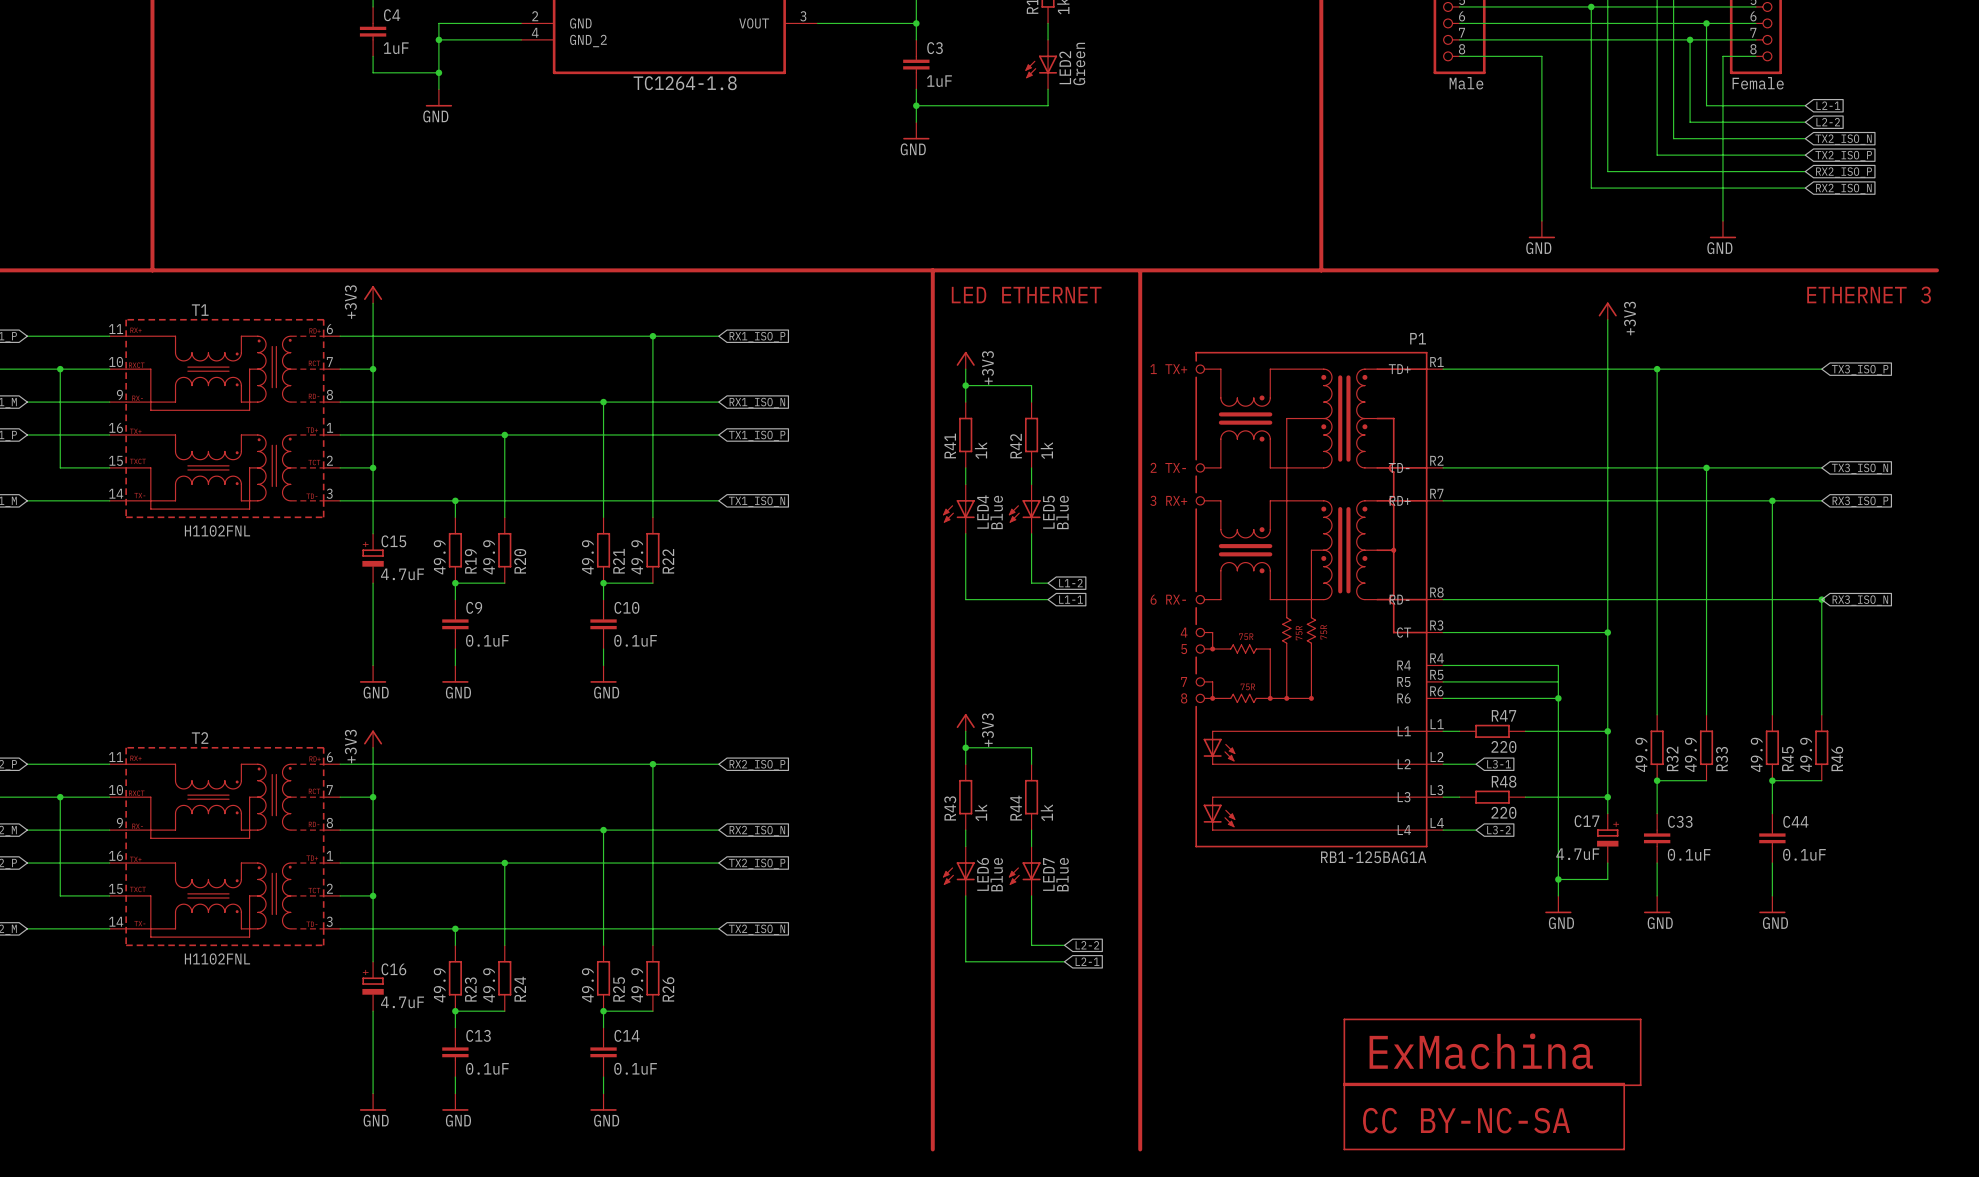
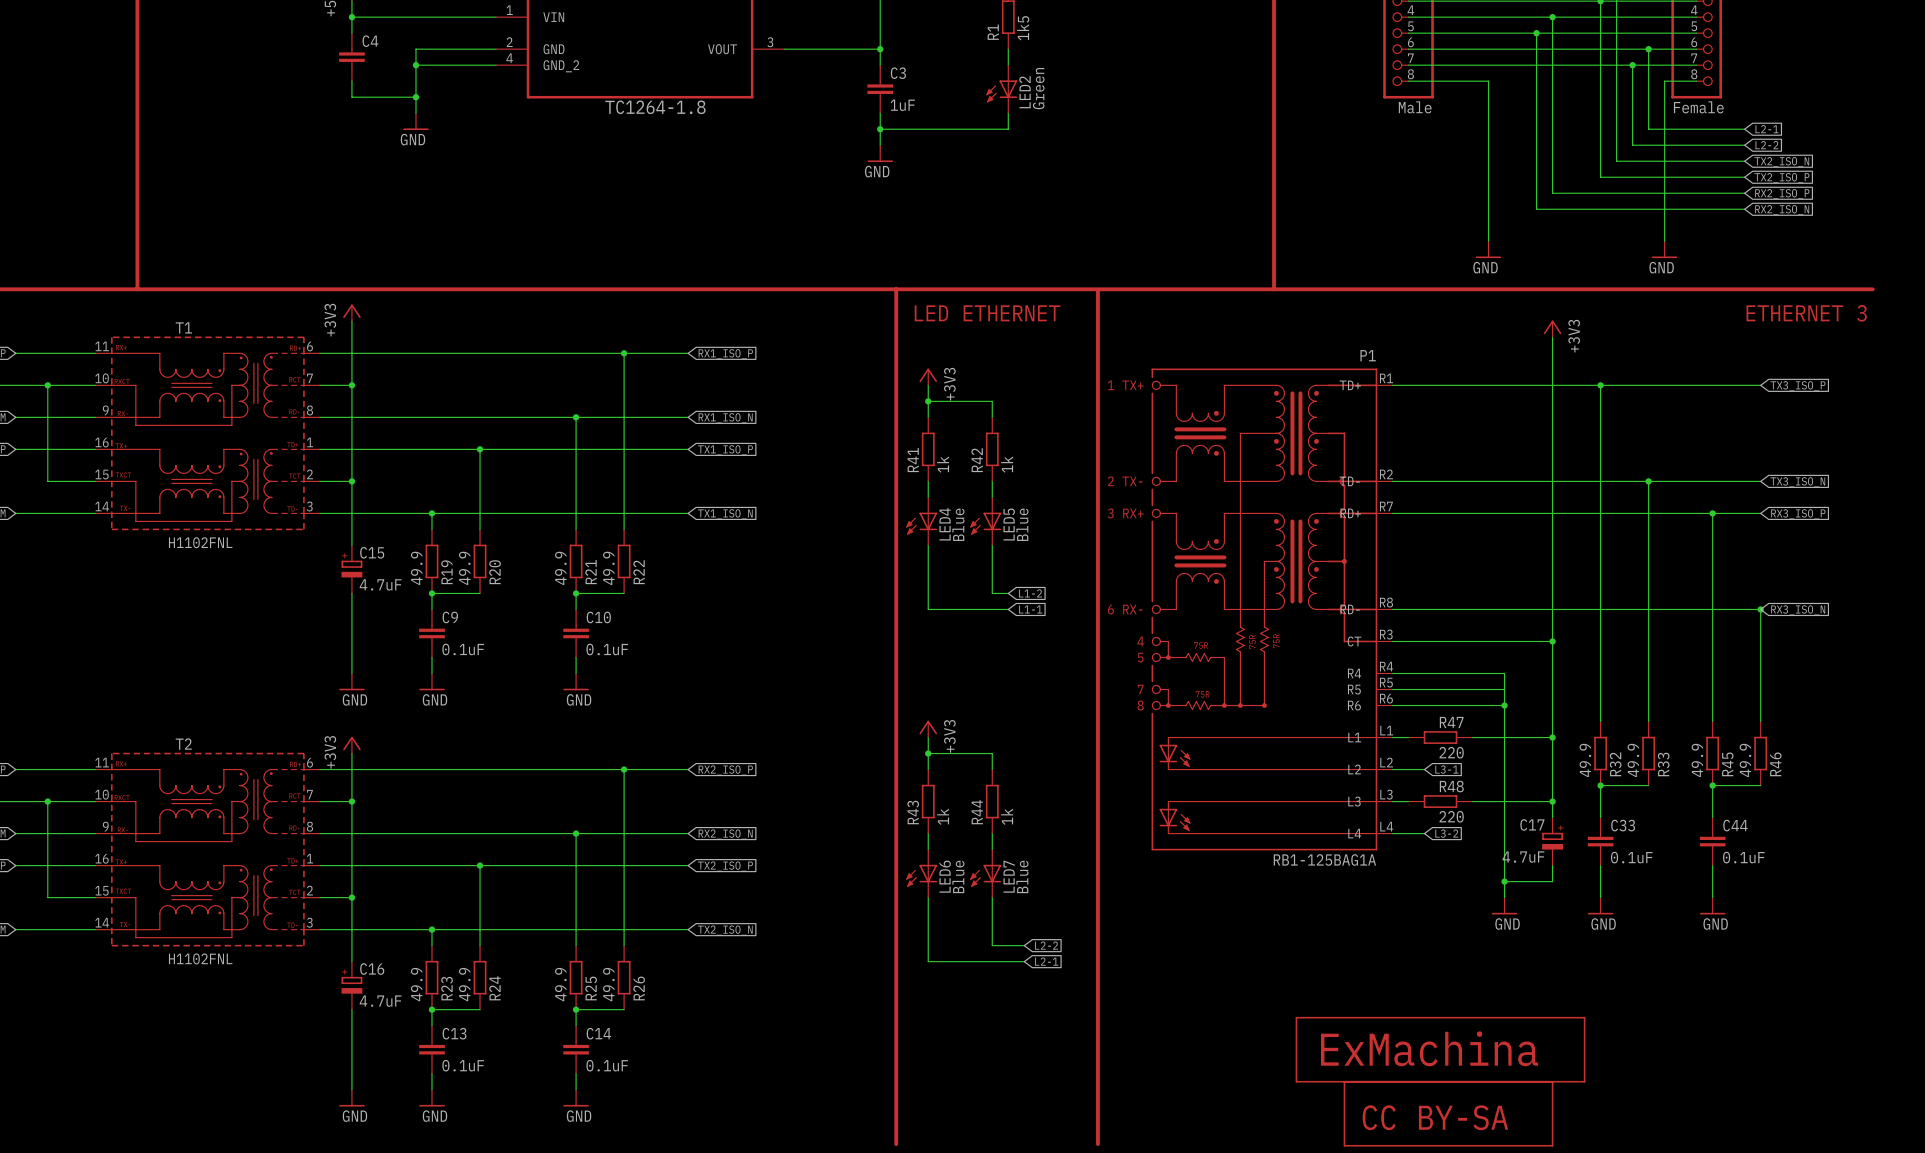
C4 value: 1uF (396, 48) -> none
part: (1484, 1116) -> none
part: none -> (1448, 1113)

